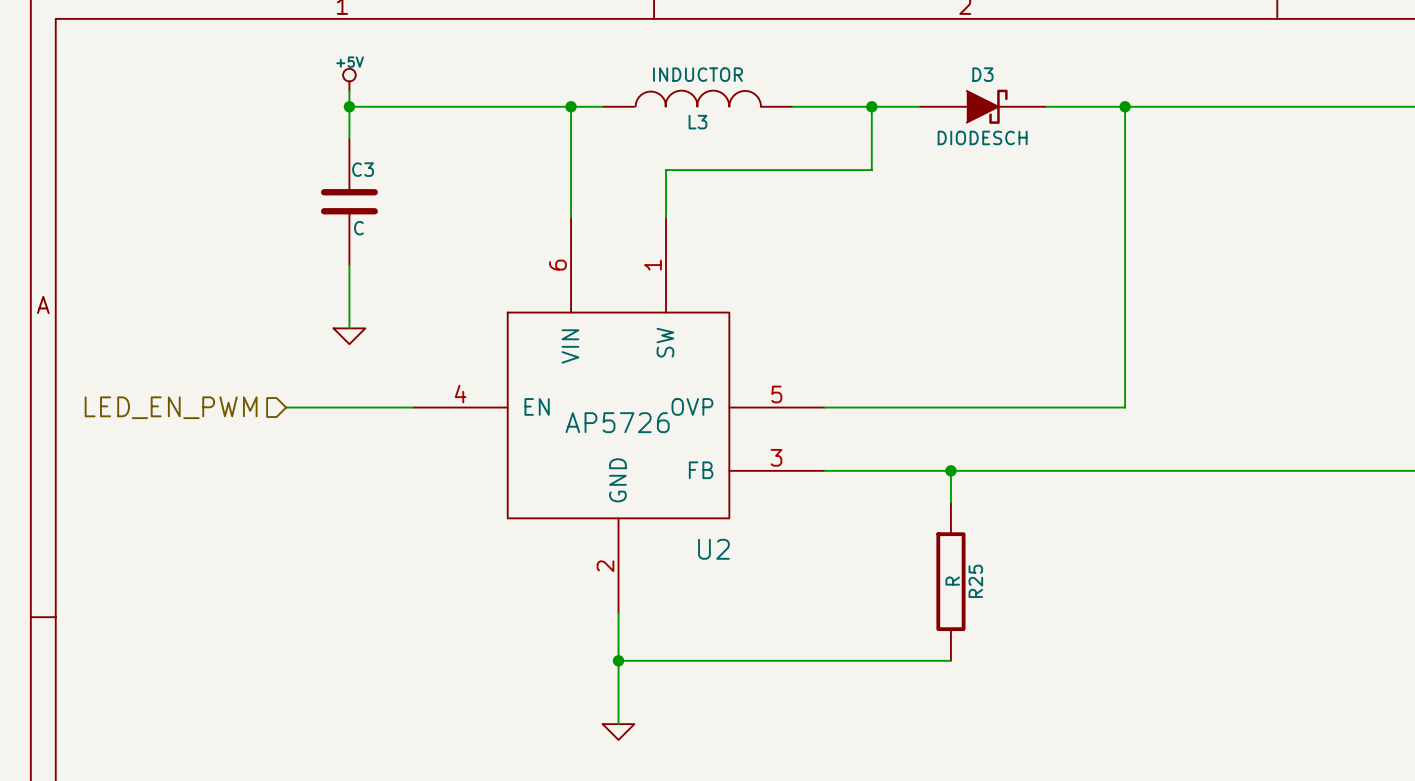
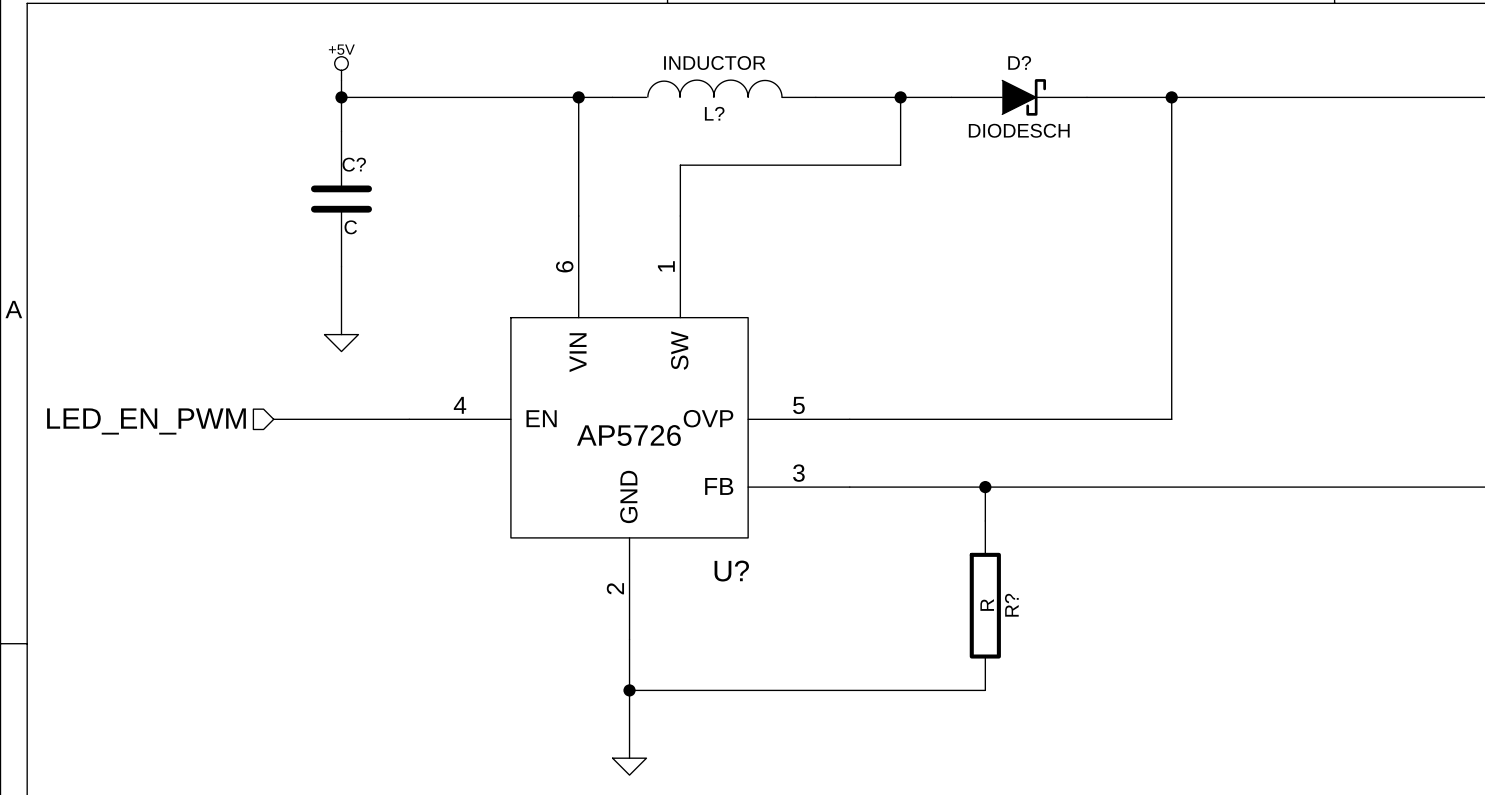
D3 name: D3 (982, 74) -> D? (1019, 62)
L3 name: L3 (697, 122) -> L? (714, 113)
C3 name: C3 (363, 169) -> C? (354, 164)
U2 name: U2 (713, 549) -> U? (731, 571)
R25 name: R25 (975, 581) -> R? (1011, 605)

